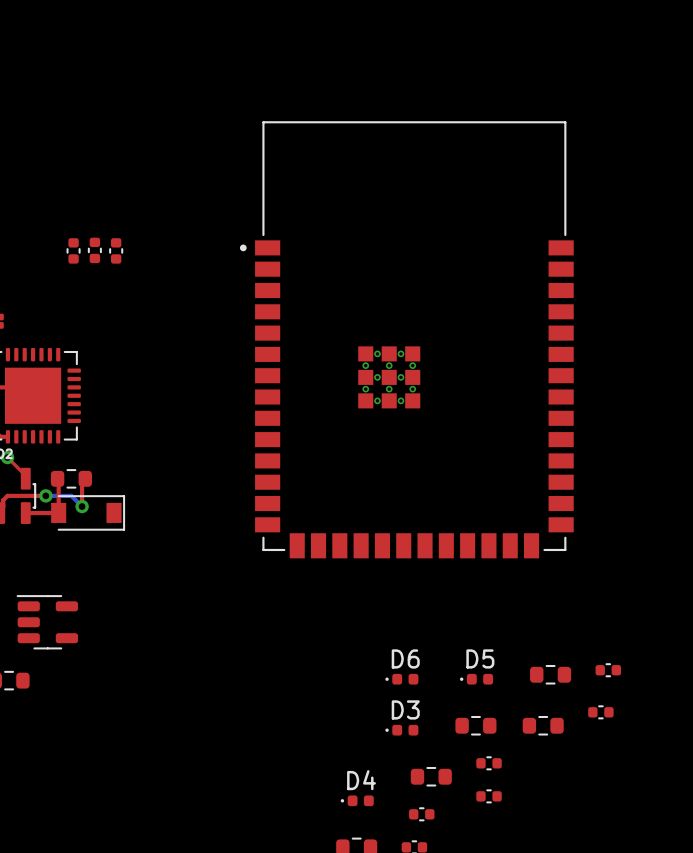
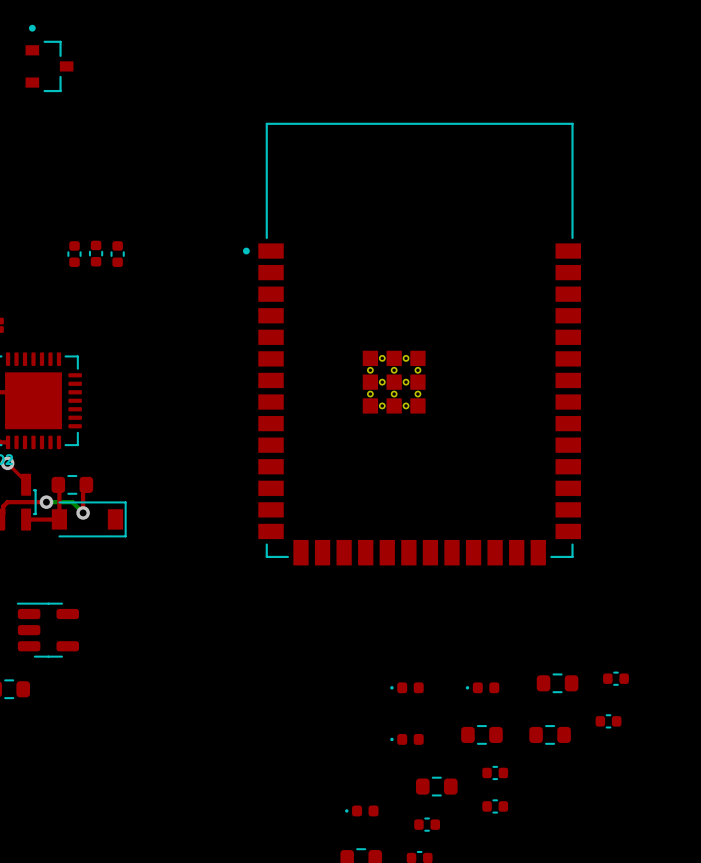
part: none -> (49, 58)
D6 name: D6 (405, 658) -> none
D5 name: D5 (480, 658) -> none
D3 name: D3 (405, 709) -> none
D4 name: D4 (361, 780) -> none

